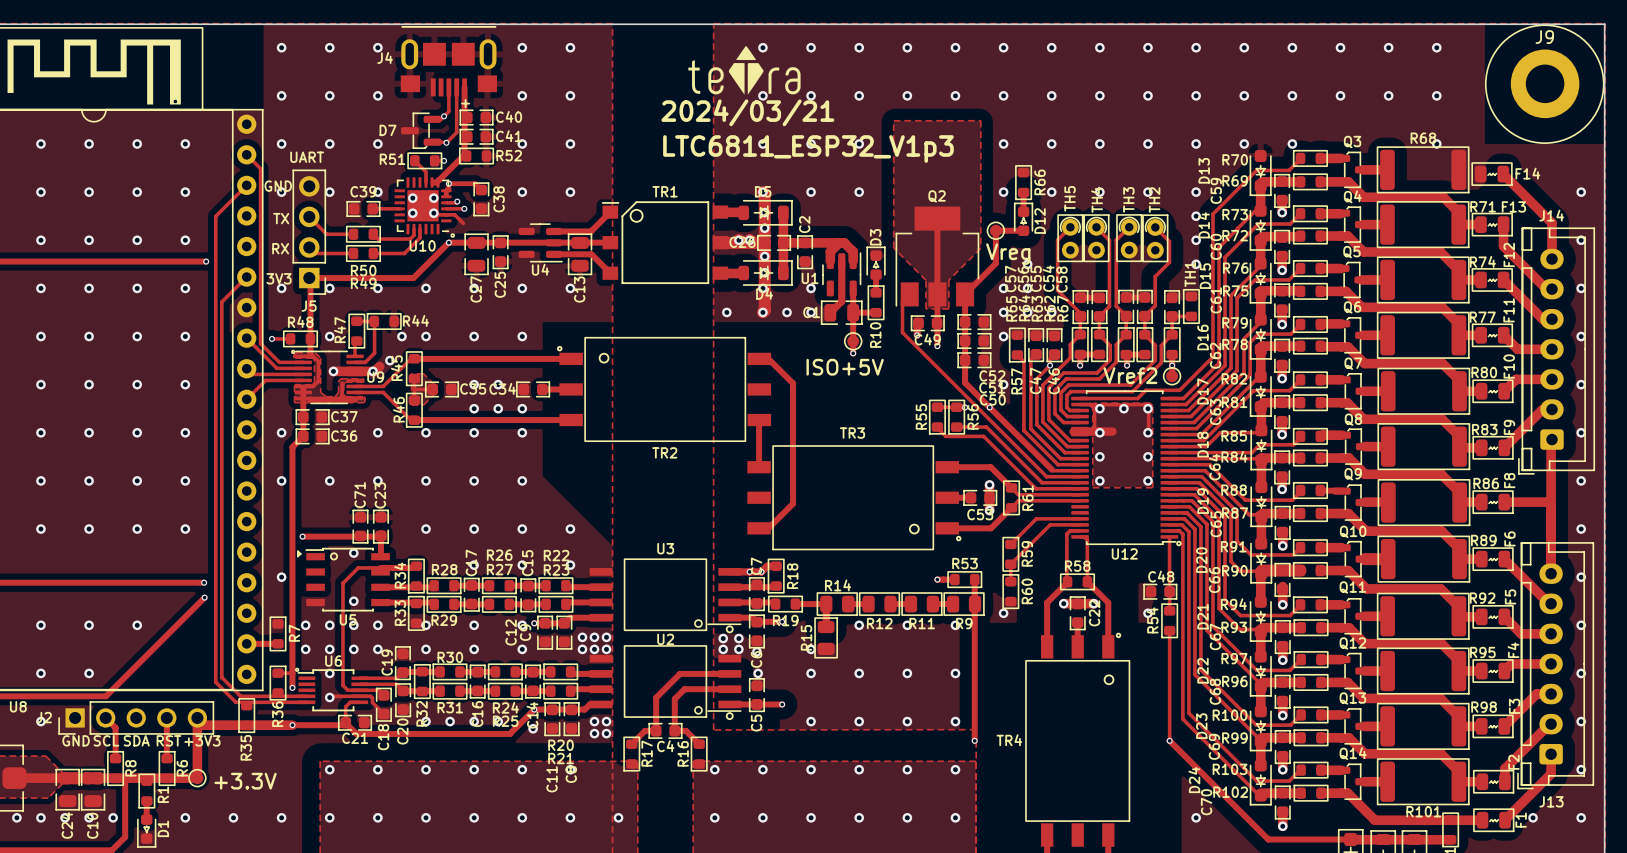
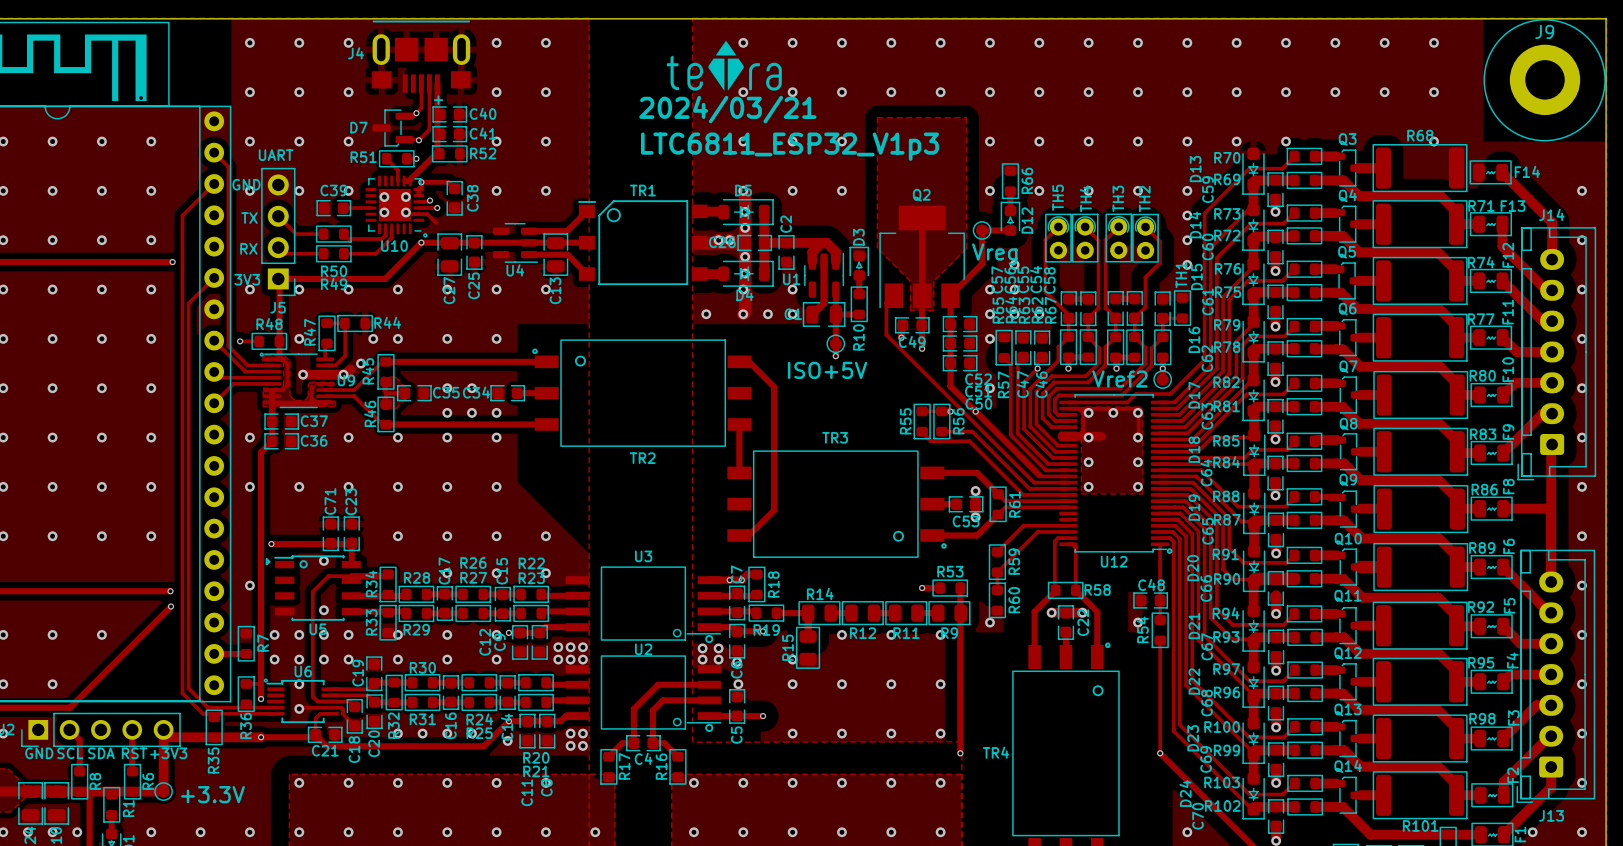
R58 name position: R58 (1077, 566) -> R58 (1097, 590)

